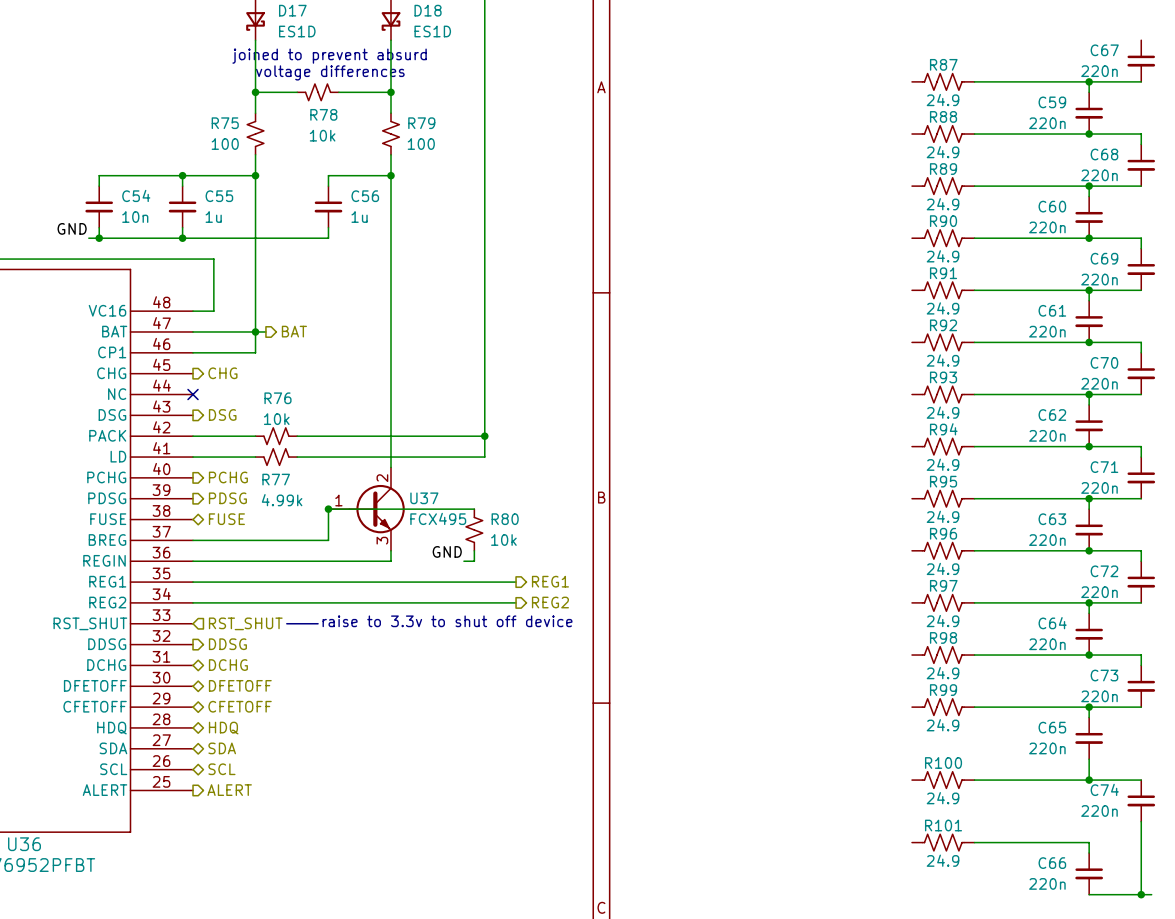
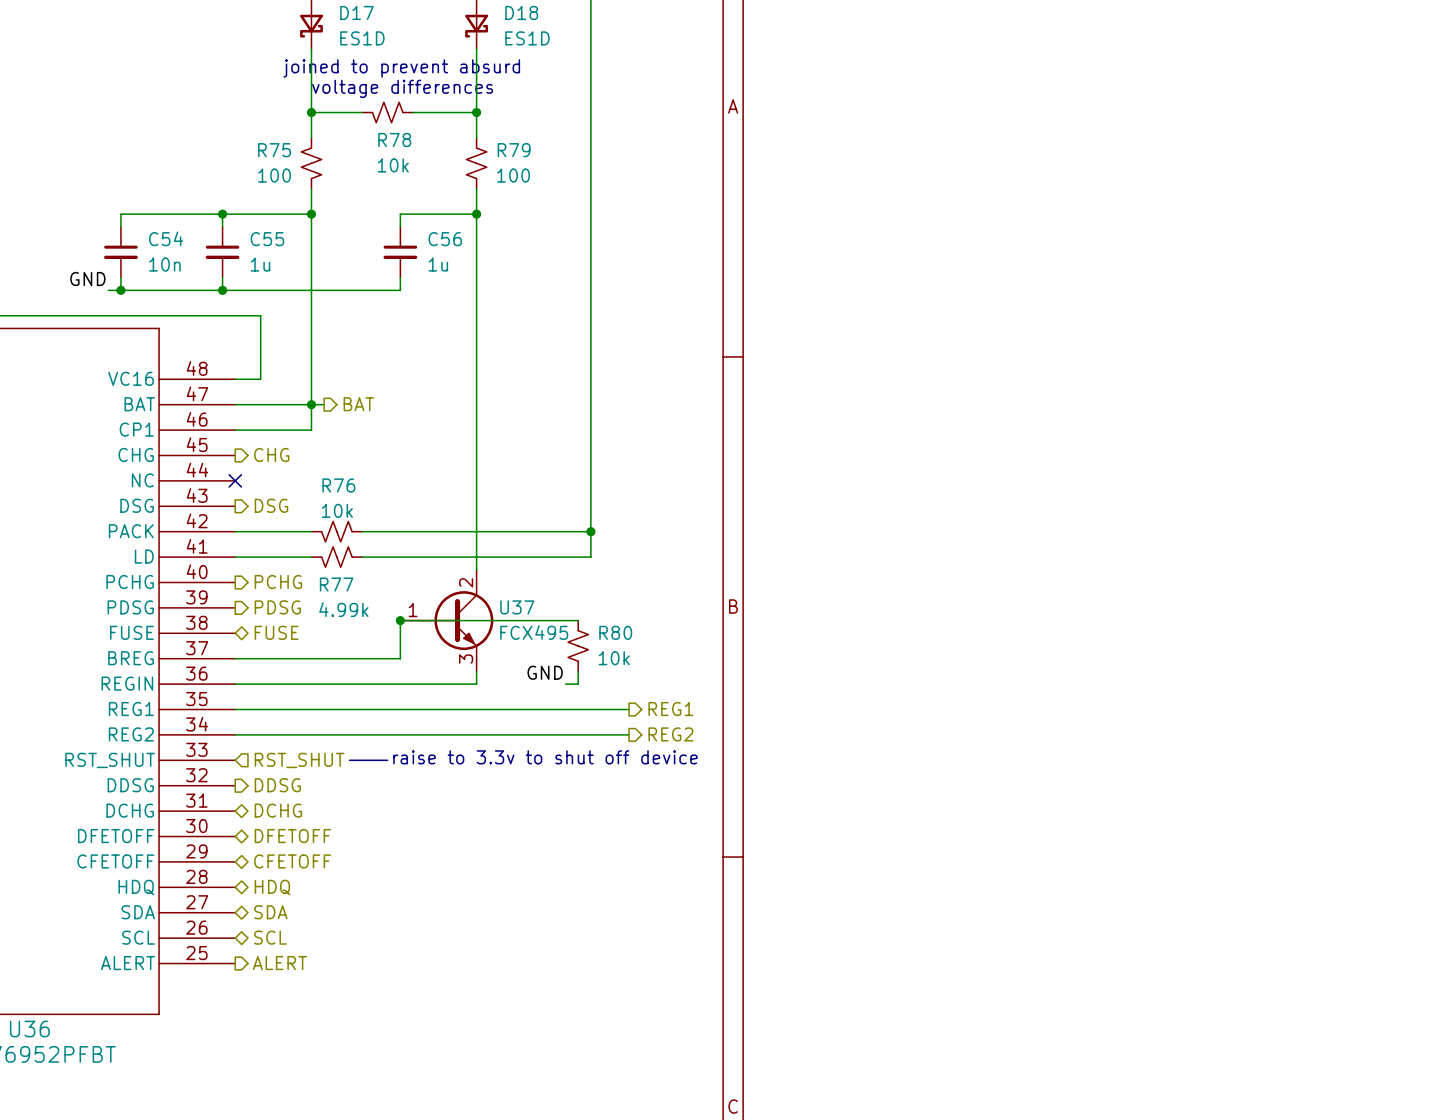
C67: 220n (1141, 61) -> none
R87: 24.9 (943, 81) -> none
wire: (974, 81) (1141, 81) -> none
wire: (1089, 81) (1089, 92) -> none
junction: (1089, 81) -> none
C59: 220n (1089, 113) -> none
R88: 24.9 (943, 134) -> none
wire: (974, 134) (1141, 134) (1141, 144) -> none
junction: (1089, 134) -> none
C68: 220n (1141, 165) -> none
R89: 24.9 (943, 186) -> none
wire: (974, 186) (1141, 186) -> none
wire: (1089, 186) (1089, 196) -> none
junction: (1089, 186) -> none
C60: 220n (1089, 217) -> none
R90: 24.9 (943, 238) -> none
wire: (974, 238) (1141, 238) (1141, 248) -> none
junction: (1089, 238) -> none
C69: 220n (1141, 269) -> none
R91: 24.9 (943, 290) -> none
wire: (974, 290) (1141, 290) -> none
wire: (1089, 290) (1089, 300) -> none
junction: (1089, 290) -> none
C61: 220n (1089, 321) -> none
R92: 24.9 (943, 342) -> none
wire: (974, 342) (1141, 342) (1141, 352) -> none
junction: (1089, 342) -> none
C70: 220n (1141, 373) -> none
R93: 24.9 (943, 394) -> none
wire: (974, 394) (1141, 394) -> none
wire: (1089, 394) (1089, 404) -> none
junction: (1089, 394) -> none
C62: 220n (1089, 425) -> none
R94: 24.9 (943, 446) -> none
wire: (974, 446) (1141, 446) (1141, 457) -> none
junction: (1089, 446) -> none
C71: 220n (1141, 477) -> none
R95: 24.9 (943, 498) -> none
wire: (974, 498) (1141, 498) -> none
wire: (1089, 498) (1089, 509) -> none
junction: (1089, 498) -> none
C63: 220n (1089, 529) -> none
R96: 24.9 (943, 550) -> none
wire: (974, 550) (1141, 550) (1141, 561) -> none
junction: (1089, 550) -> none
C72: 220n (1141, 582) -> none
R97: 24.9 (943, 602) -> none
wire: (974, 602) (1141, 602) -> none
wire: (1089, 602) (1089, 613) -> none
junction: (1089, 602) -> none
C64: 220n (1089, 634) -> none
R98: 24.9 (943, 655) -> none
wire: (974, 655) (1141, 655) (1141, 665) -> none
junction: (1089, 655) -> none
C73: 220n (1141, 686) -> none
R99: 24.9 (943, 707) -> none
wire: (974, 707) (1141, 707) -> none
wire: (1089, 707) (1089, 717) -> none
junction: (1089, 707) -> none
C65: 220n (1089, 738) -> none
wire: (1089, 759) (1089, 780) -> none
R100: 24.9 (943, 780) -> none
wire: (974, 780) (1141, 780) -> none
junction: (1089, 780) -> none
C74: 220n (1141, 800) -> none
wire: (1141, 821) (1141, 894) -> none
R101: 24.9 (943, 842) -> none
wire: (974, 842) (1089, 842) (1089, 853) -> none
C66: 220n (1089, 873) -> none
wire: (1089, 894) (1151, 894) -> none
junction: (1141, 894) -> none

